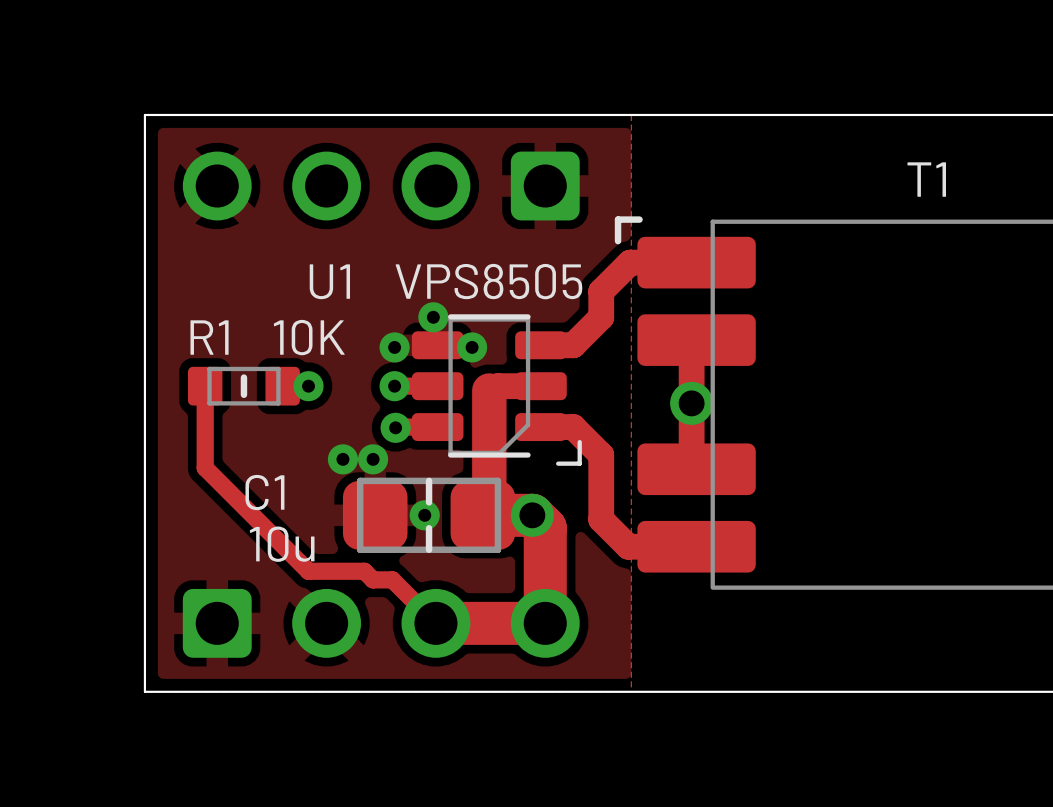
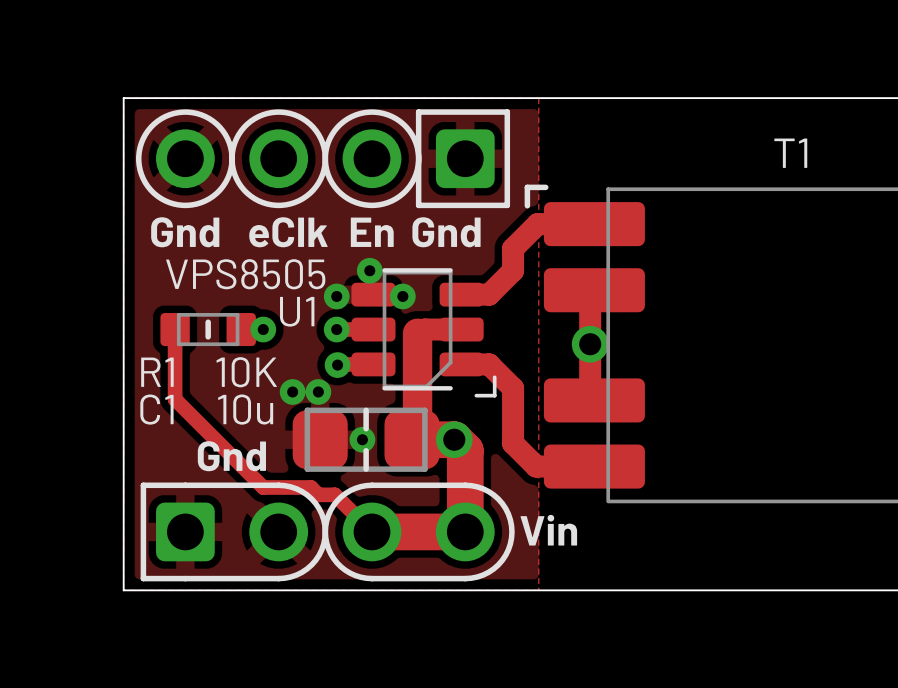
drawing: none -> [135, 109, 422, 209]
line: none -> (418, 112) (507, 112) (507, 205) (418, 205) (418, 112)
text: none -> Gnd (185, 232)
text: none -> eClk (288, 232)
text: none -> En (372, 232)
text: none -> Gnd (446, 232)
U1 name position: U1 (329, 281) -> U1 (297, 311)
U1 value position: VPS8505 (488, 281) -> VPS8505 (245, 274)
R1 name position: R1 (209, 337) -> R1 (157, 372)
R1 value position: 10K (309, 337) -> 10K (246, 372)
C1 name position: C1 (264, 492) -> C1 (156, 409)
text: none -> Gnd (231, 456)
C1 value position: 10u (282, 544) -> 10u (245, 409)
line: none -> (143, 485) (278, 485) (296, 488) (311, 498) (321, 514) (325, 531) (321, 549) (315, 560) (307, 568) (296, 575) (284, 578) (143, 578) (143, 485)
line: none -> (372, 485) (465, 485) (477, 486) (488, 491) (502, 503) (510, 519) (511, 538) (505, 555) (498, 564) (488, 572) (471, 578) (372, 578) (350, 573) (337, 562) (330, 553) (325, 537) (326, 520) (333, 505) (341, 497) (355, 488) (372, 485)
text: none -> Vin (548, 530)

